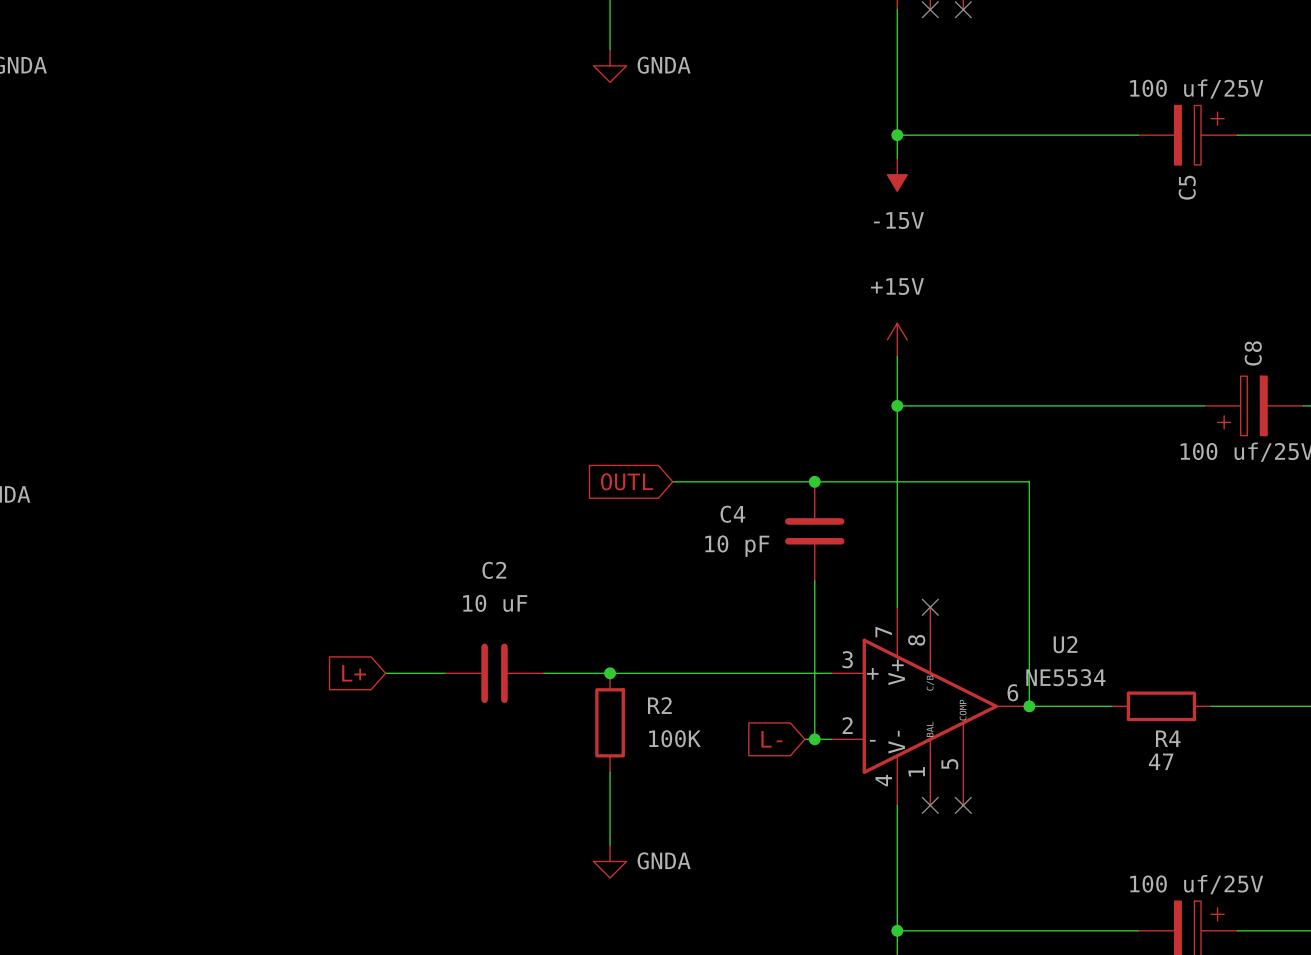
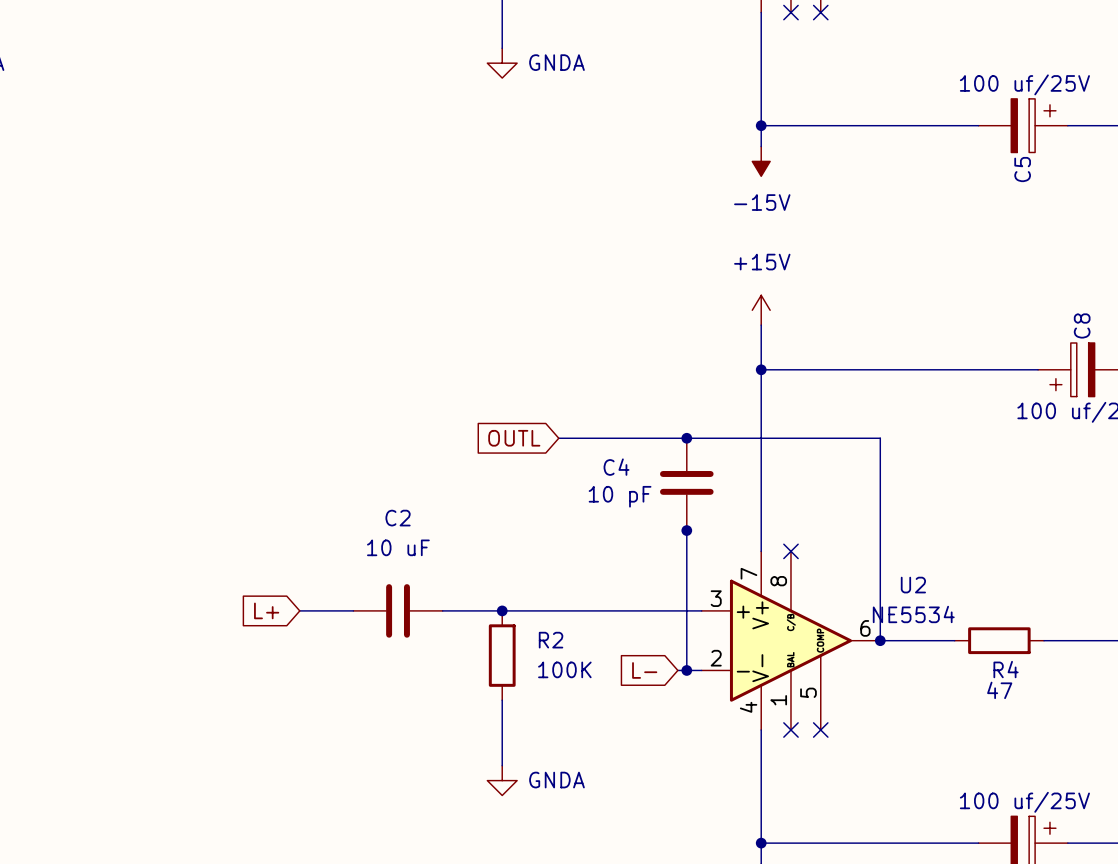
junction: none -> (686, 530)

